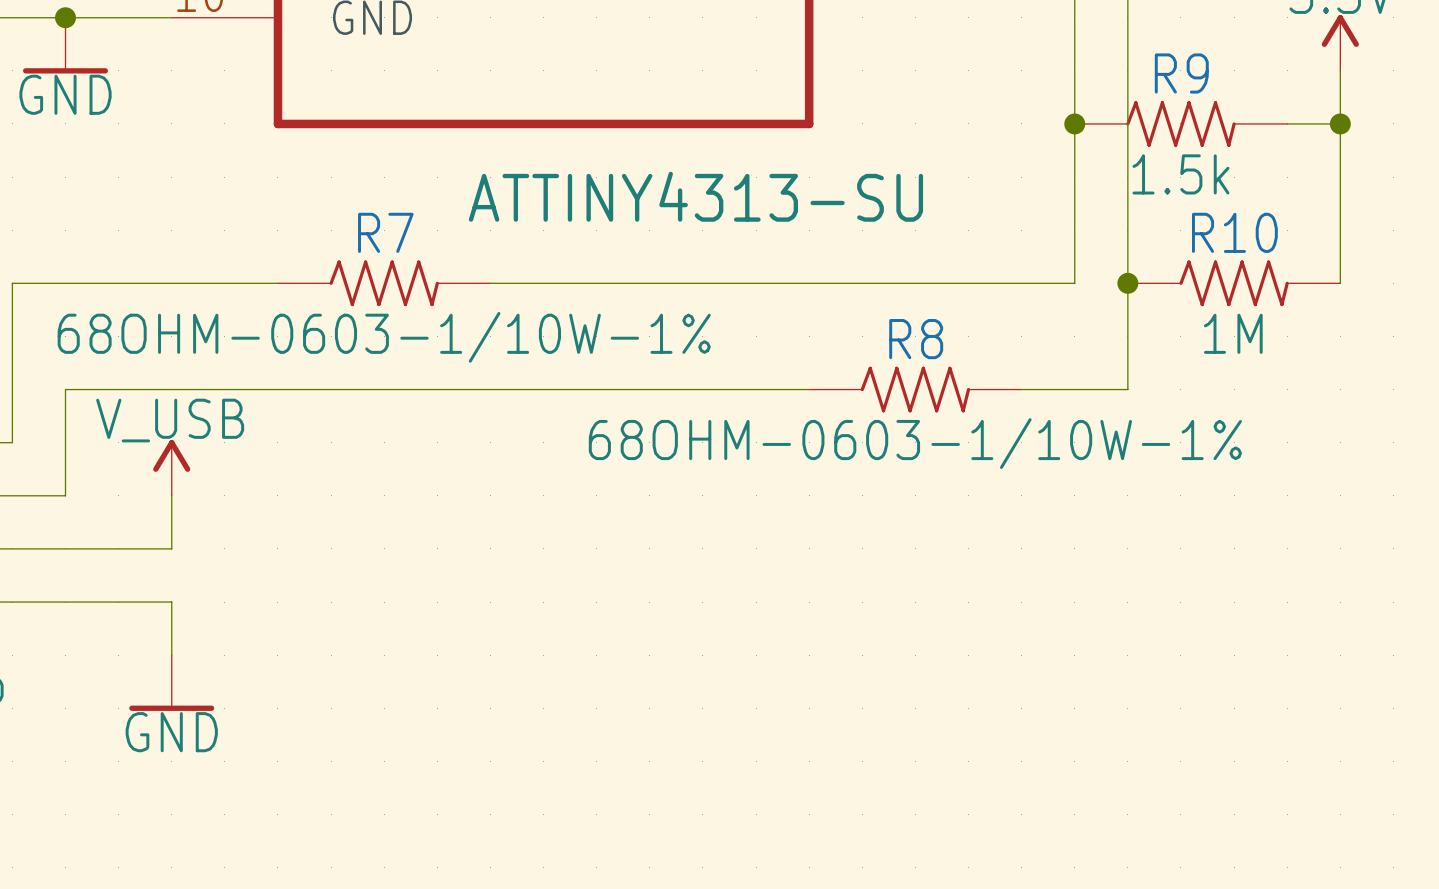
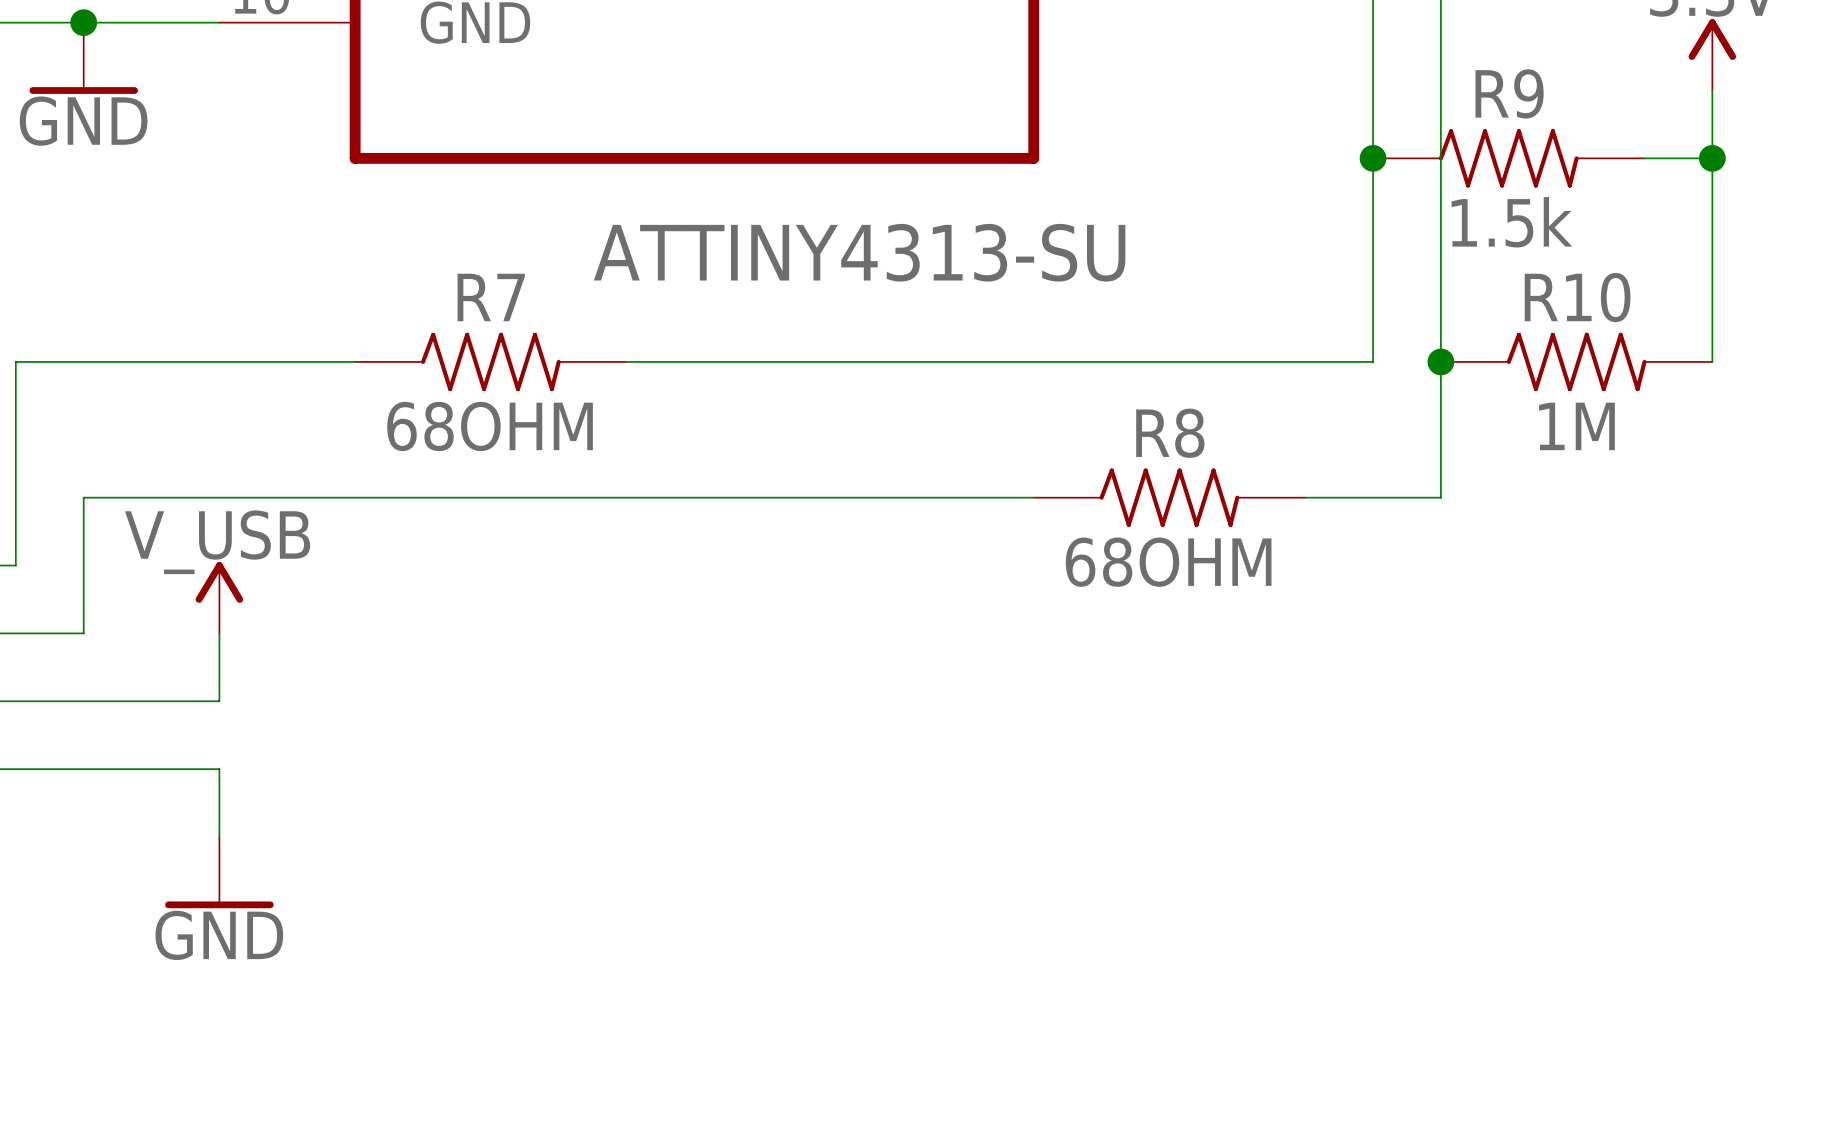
R7 value: 68OHM-0603-1/10W-1% (384, 337) -> 68OHM (490, 426)
R8 value: 68OHM-0603-1/10W-1% (915, 443) -> 68OHM (1168, 562)

